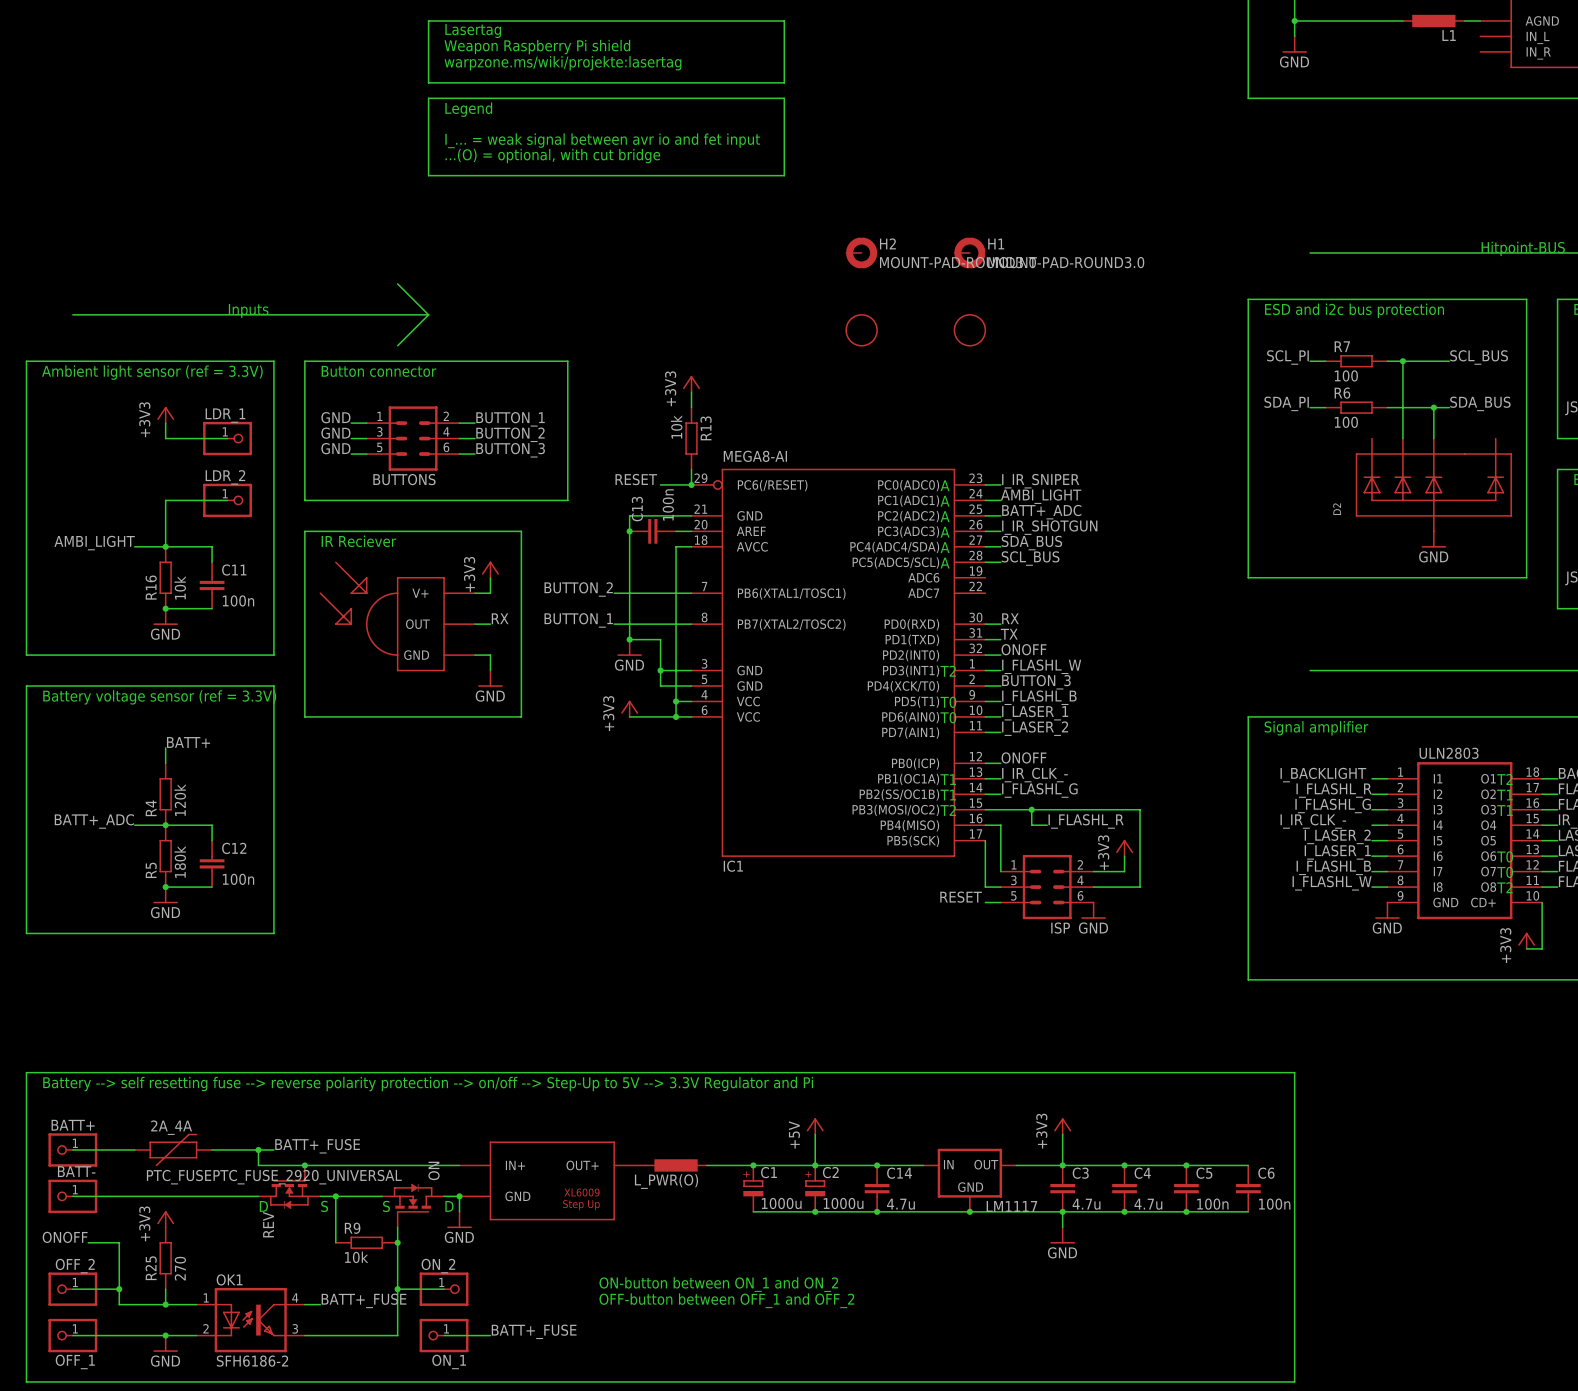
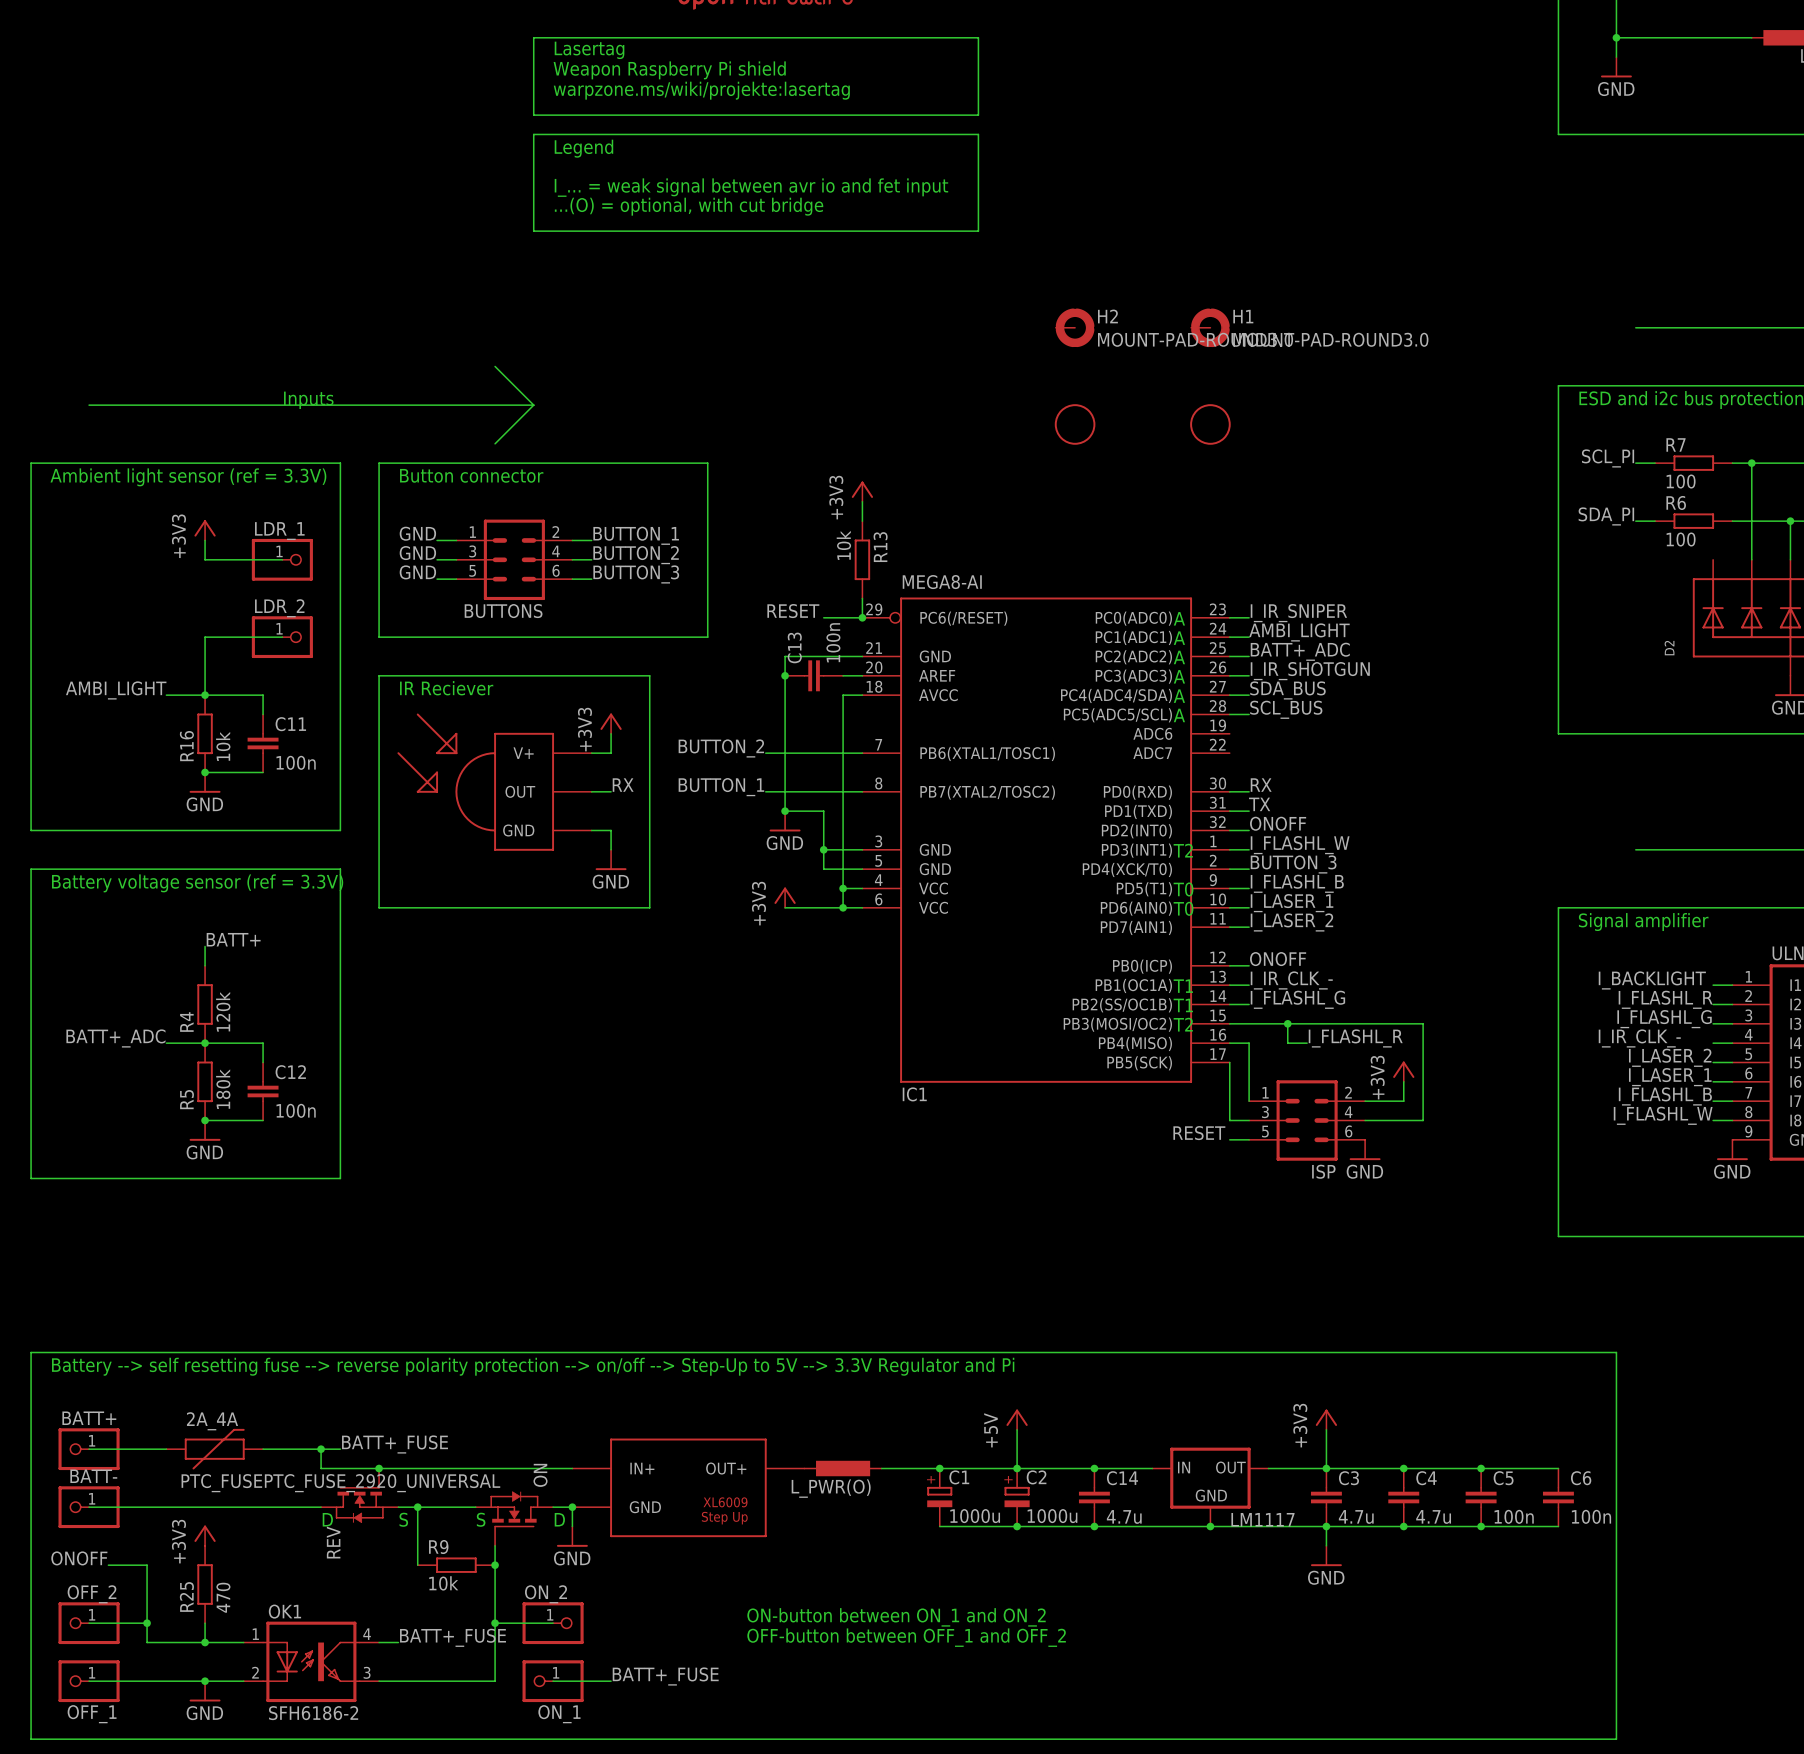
R25 value: 270 (180, 1268) -> 470 (223, 1597)

